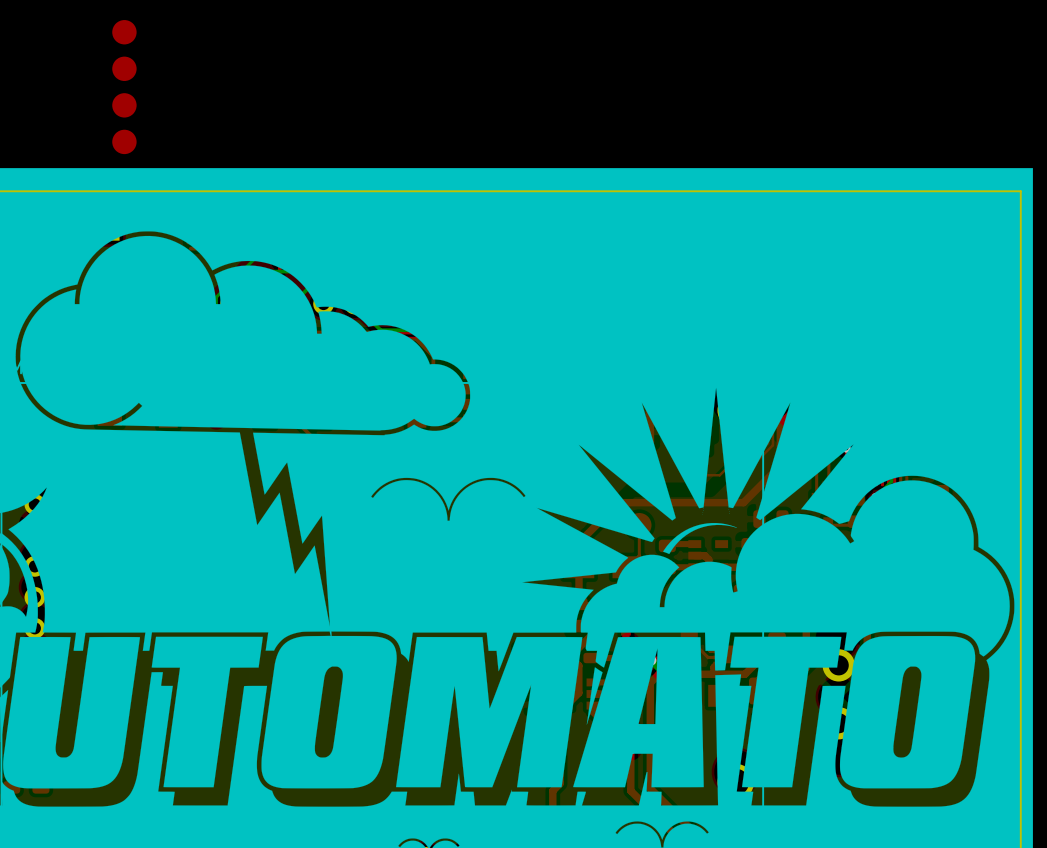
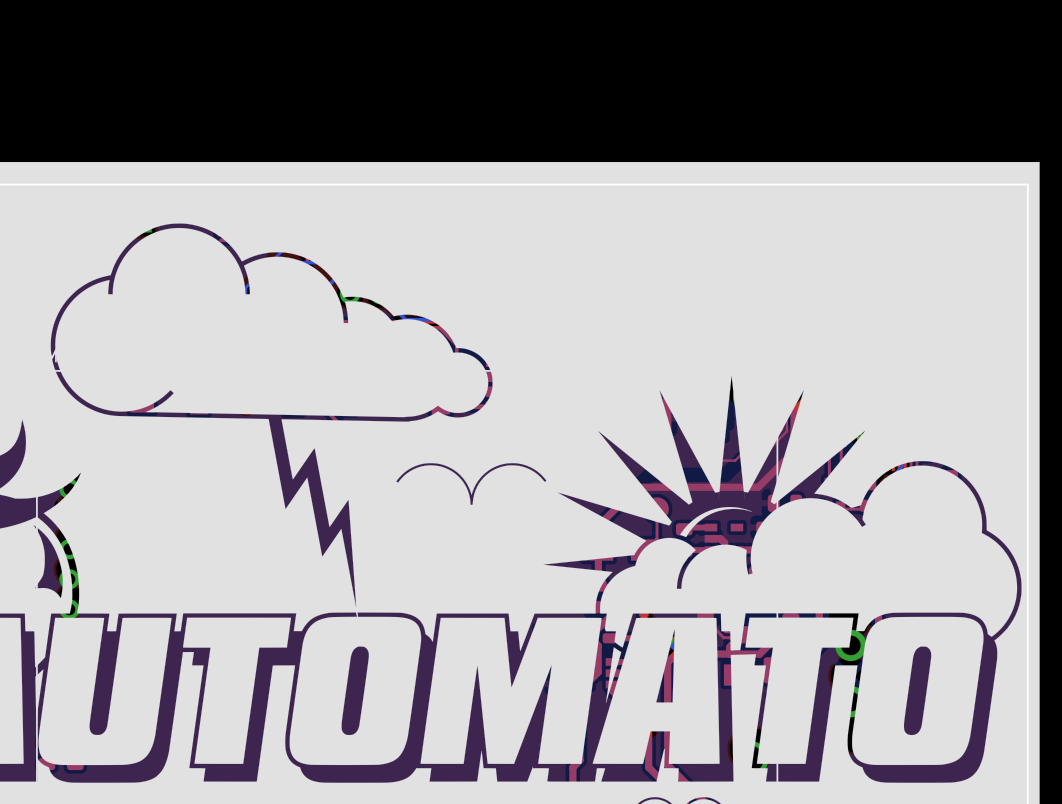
part: (124, 32) -> none
part: (124, 68) -> none
part: (124, 105) -> none
part: (124, 141) -> none

